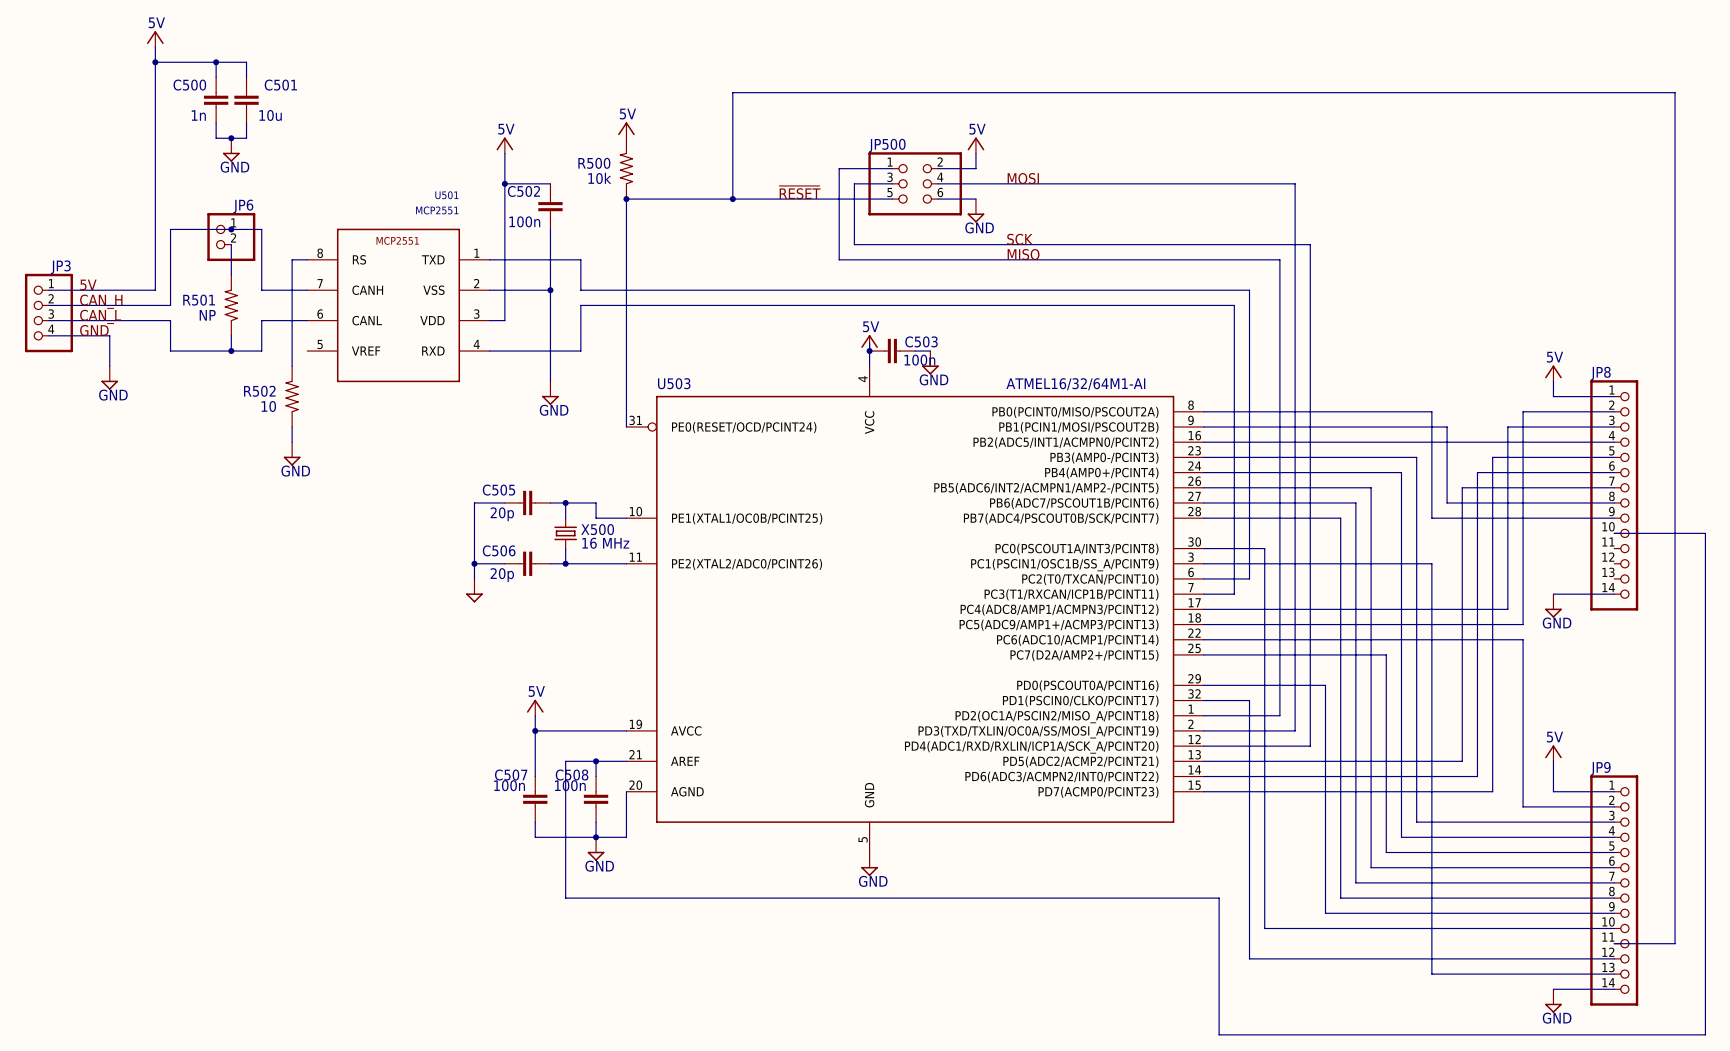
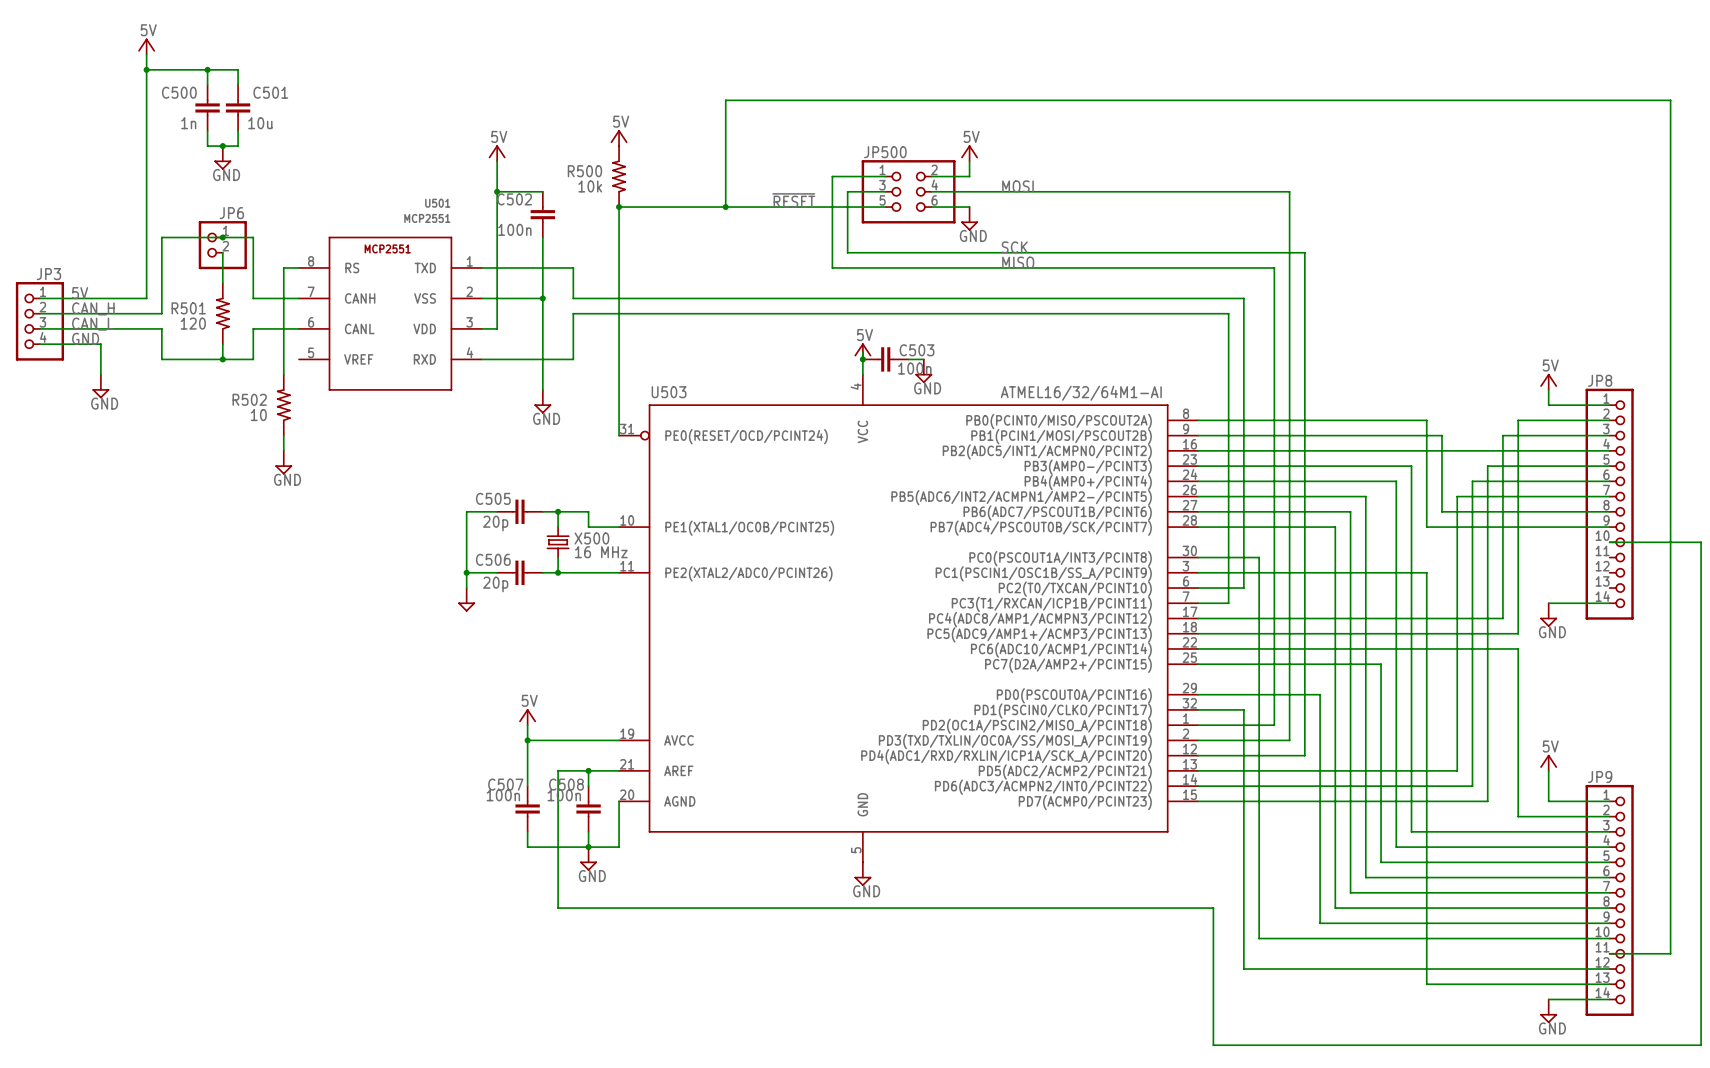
R501 value: NP (207, 315) -> 120 (193, 323)

